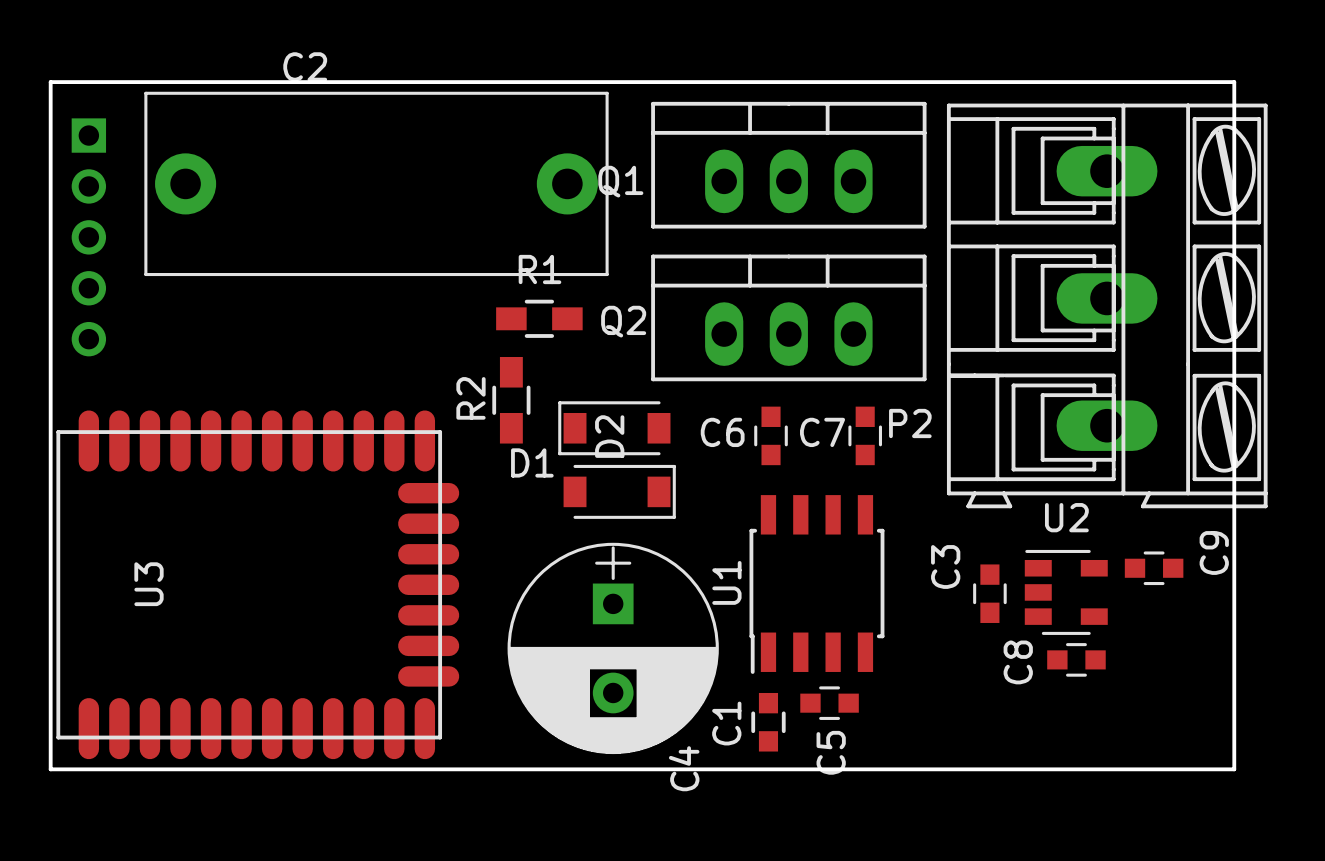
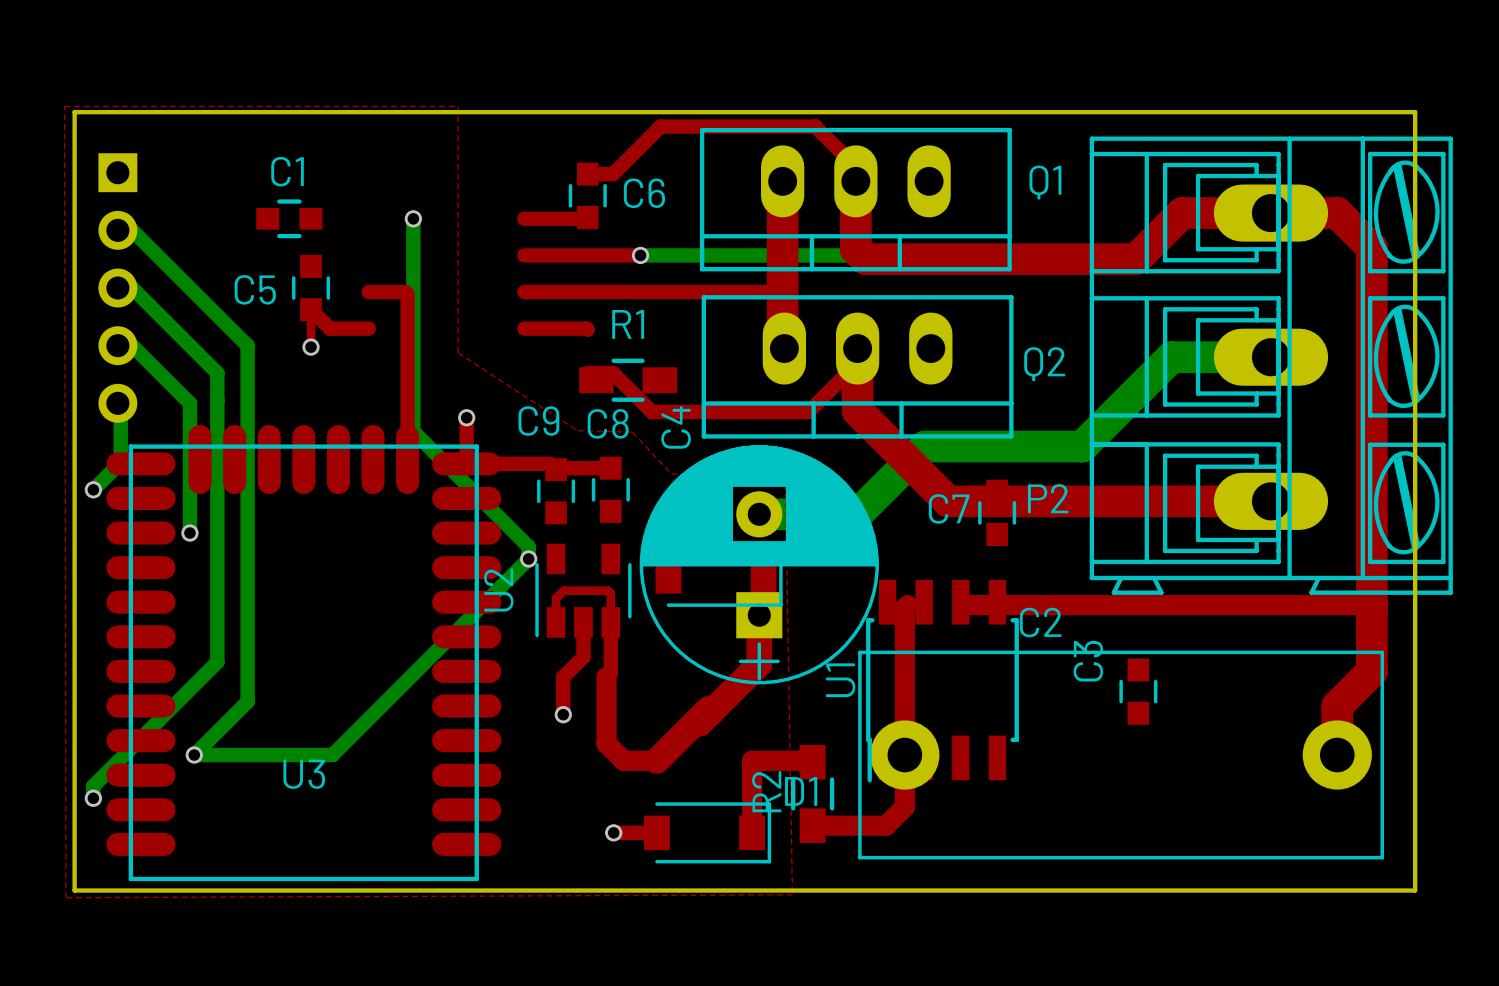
top zone outline: none -> (64, 106) (458, 106) (458, 352) (577, 430) (632, 432) (671, 473) (785, 473) (792, 894) (65, 897) (64, 106)
top track: none -> (587, 174) (613, 174) (660, 126) (815, 126) (855, 166) (855, 249) (865, 259) (1136, 259) (1182, 213) (1337, 213) (1371, 247) (1371, 671) (1337, 706) (1337, 755)
top track: none -> (782, 181) (782, 346) (784, 348) (784, 300) (776, 292) (524, 292)
Q1 rotation: 0° (788, 165) -> 180° (855, 199)
top track: none -> (587, 217) (524, 218)
bottom track: none -> (120, 218) (247, 345) (247, 701) (194, 755) (332, 755) (528, 559) (528, 546) (413, 431) (413, 218)
via: none -> (413, 218)
C2 position: (376, 183) -> (1121, 755)
top track: none -> (524, 255) (640, 255)
bottom track: none -> (640, 255) (929, 255)
via: none -> (640, 255)
bottom track: none -> (120, 276) (217, 373) (217, 662) (93, 786) (93, 798)
top track: none -> (368, 292) (405, 292) (407, 294) (407, 459)
top track: none -> (368, 328) (330, 328) (311, 309) (311, 347)
top track: none -> (524, 328) (587, 329)
bottom track: none -> (120, 334) (189, 403) (189, 533)
via: none -> (311, 347)
bottom track: none -> (1271, 357) (1171, 357) (1082, 446) (925, 446) (857, 514) (759, 514)
top track: none -> (587, 373) (613, 373) (651, 411) (808, 411) (857, 362) (857, 348) (857, 410) (948, 501) (1271, 501)
Q2 rotation: 0° (788, 317) -> 180° (857, 366)
bottom track: none -> (120, 391) (120, 462) (93, 489)
top track: none -> (466, 417) (466, 463) (550, 463) (556, 469) (610, 468)
via: none -> (466, 417)
R2 position: (511, 400) -> (812, 793)
via: none -> (93, 489)
D1 rotation: 0° (614, 428) -> 180° (707, 832)
D1 position: (614, 428) -> (707, 832)
C6 name position: C6 (722, 432) -> C6 (644, 193)
C6 position: (771, 435) -> (587, 195)
via: none -> (189, 533)
via: none -> (528, 559)
top track: none -> (907, 605) (904, 608) (904, 806) (886, 825) (812, 825)
top track: none -> (971, 605) (1371, 605)
top track: none -> (759, 615) (759, 664) (700, 723) (694, 723)
top track: none -> (556, 622) (556, 598) (563, 590) (607, 590) (610, 593) (610, 672) (606, 677) (606, 743) (623, 760) (656, 760) (708, 708)
top track: none -> (583, 622) (583, 657) (563, 677) (563, 714)
C9 name position: C9 (1214, 552) -> C9 (538, 421)
C9 rotation: 0° (1154, 568) -> 90° clockwise (556, 491)
C9 position: (1154, 568) -> (556, 491)
U3 rotation: 0° (257, 584) -> 90° counterclockwise (303, 653)
U2 rotation: 0° (1066, 592) -> 90° counterclockwise (583, 590)
U2 position: (1066, 592) -> (583, 590)
via: none -> (563, 714)
C4 rotation: 0° (613, 648) -> 180° (759, 564)
C4 position: (613, 648) -> (759, 564)
via: none -> (194, 755)
top track: none -> (808, 762) (752, 760) (752, 832)
C8 rotation: 0° (1076, 659) -> 90° clockwise (610, 489)
C8 position: (1076, 659) -> (610, 489)
via: none -> (93, 798)
C5 rotation: 0° (829, 703) -> 90° clockwise (311, 288)
C5 position: (829, 703) -> (311, 288)
top track: none -> (613, 832) (656, 832)
via: none -> (613, 832)
C1 rotation: 0° (768, 722) -> 90° clockwise (289, 218)
C1 position: (768, 722) -> (289, 218)

